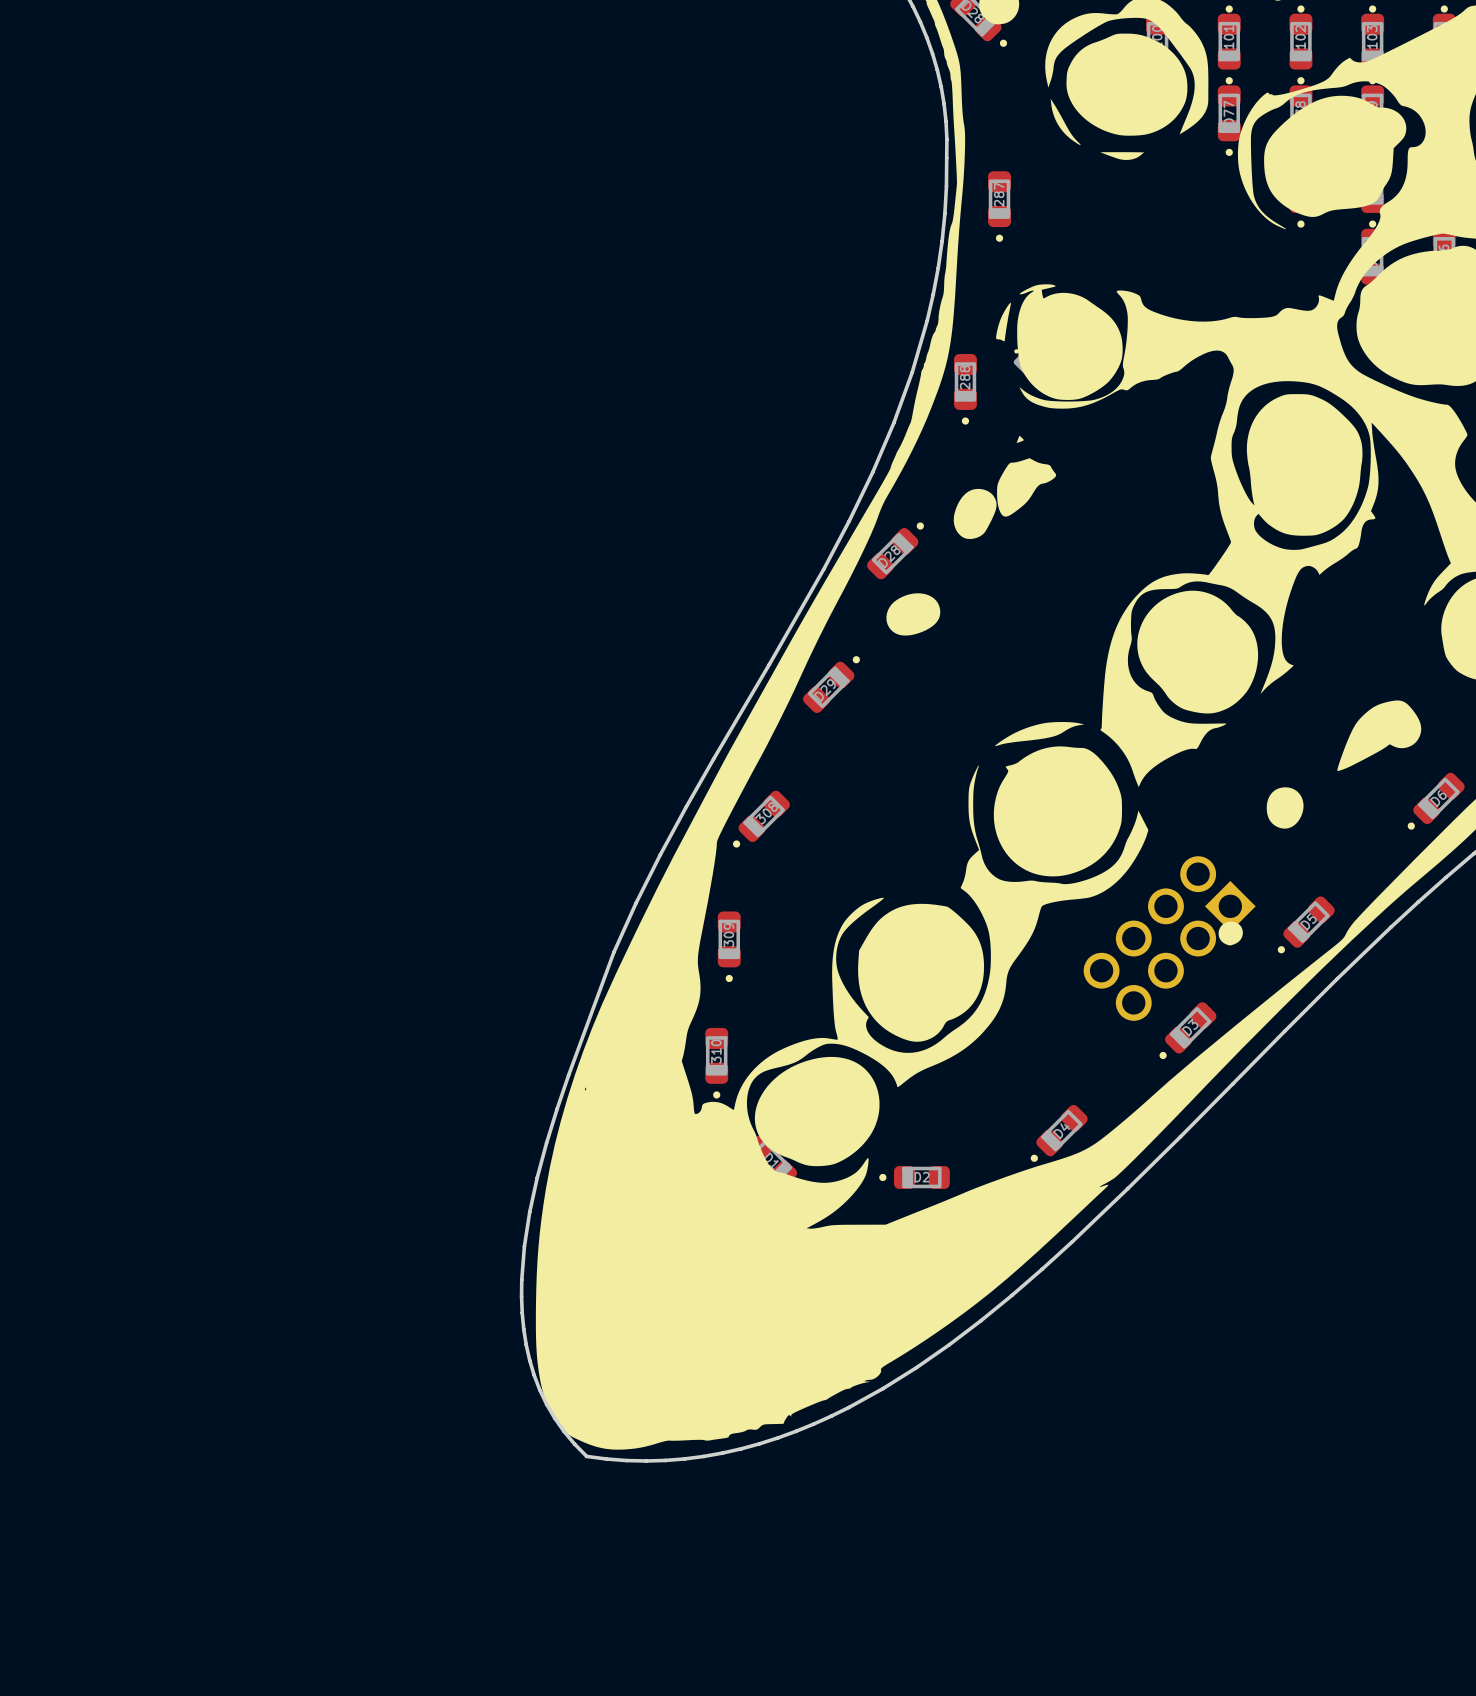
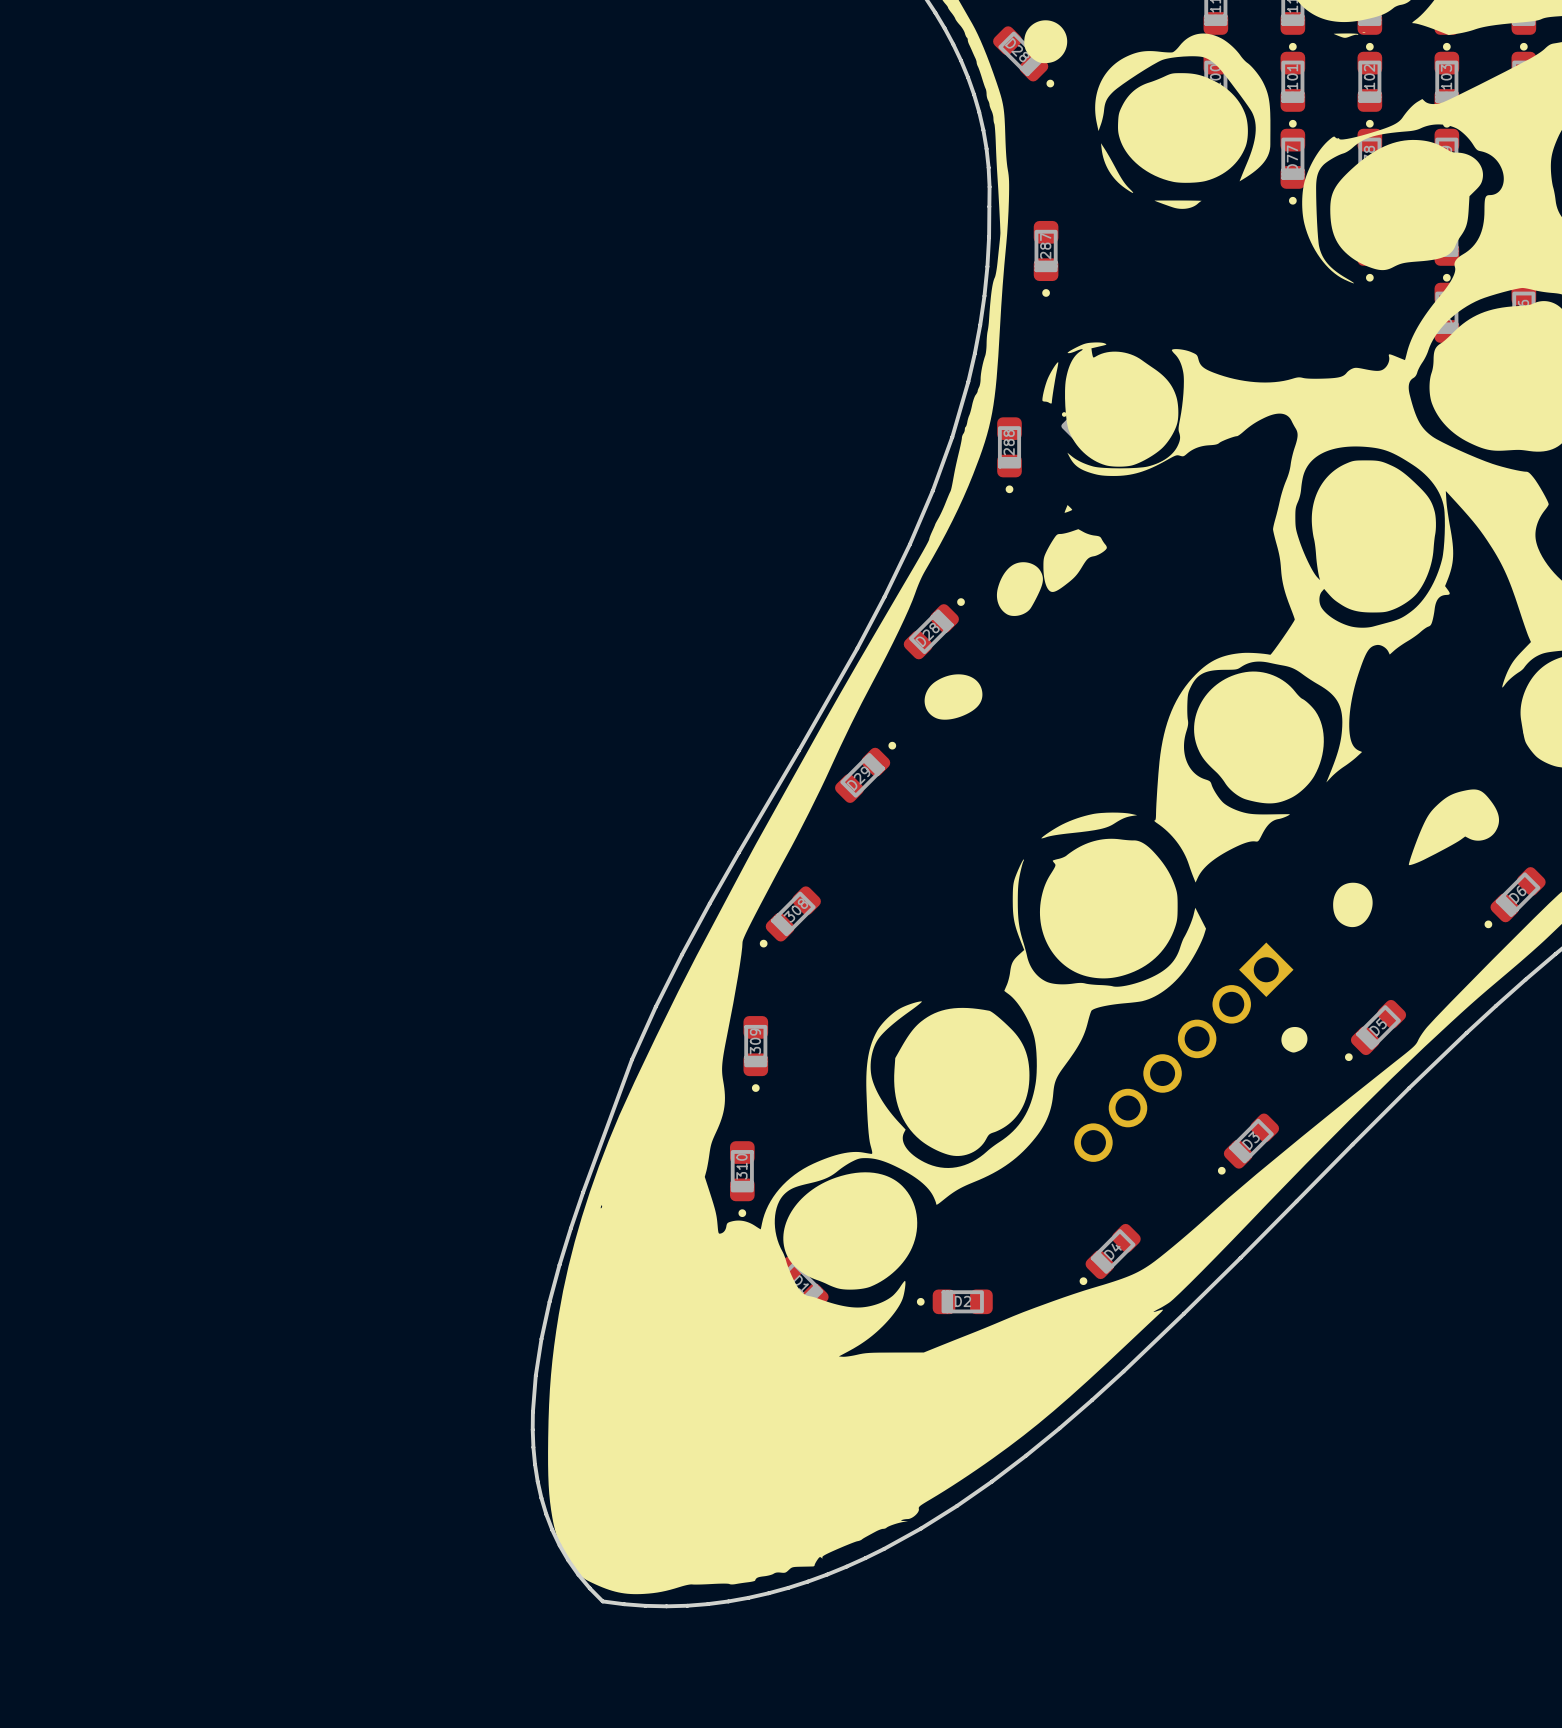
part: (1169, 938) -> none
part: none -> (1183, 1052)

